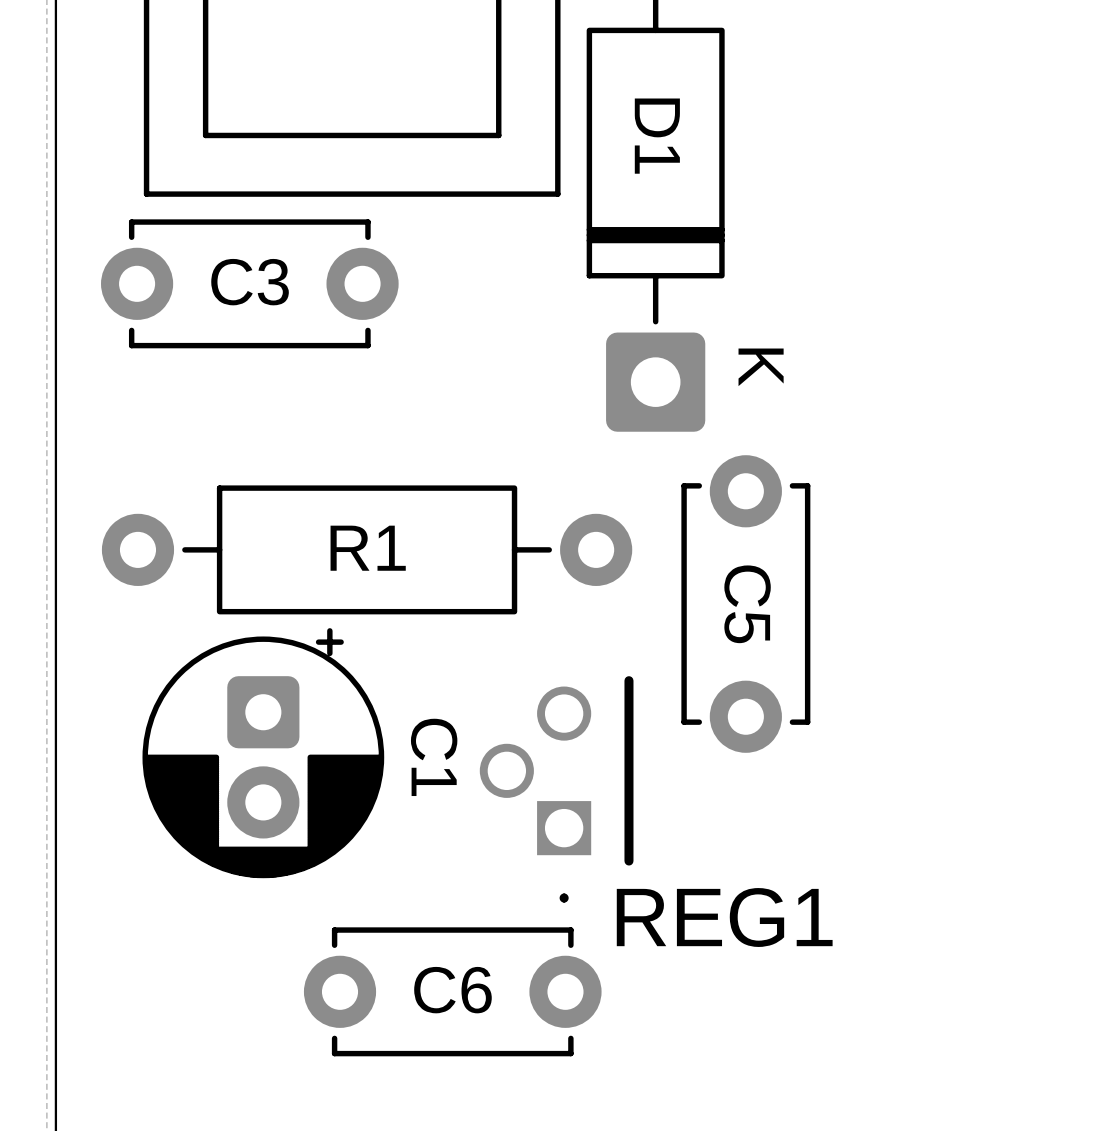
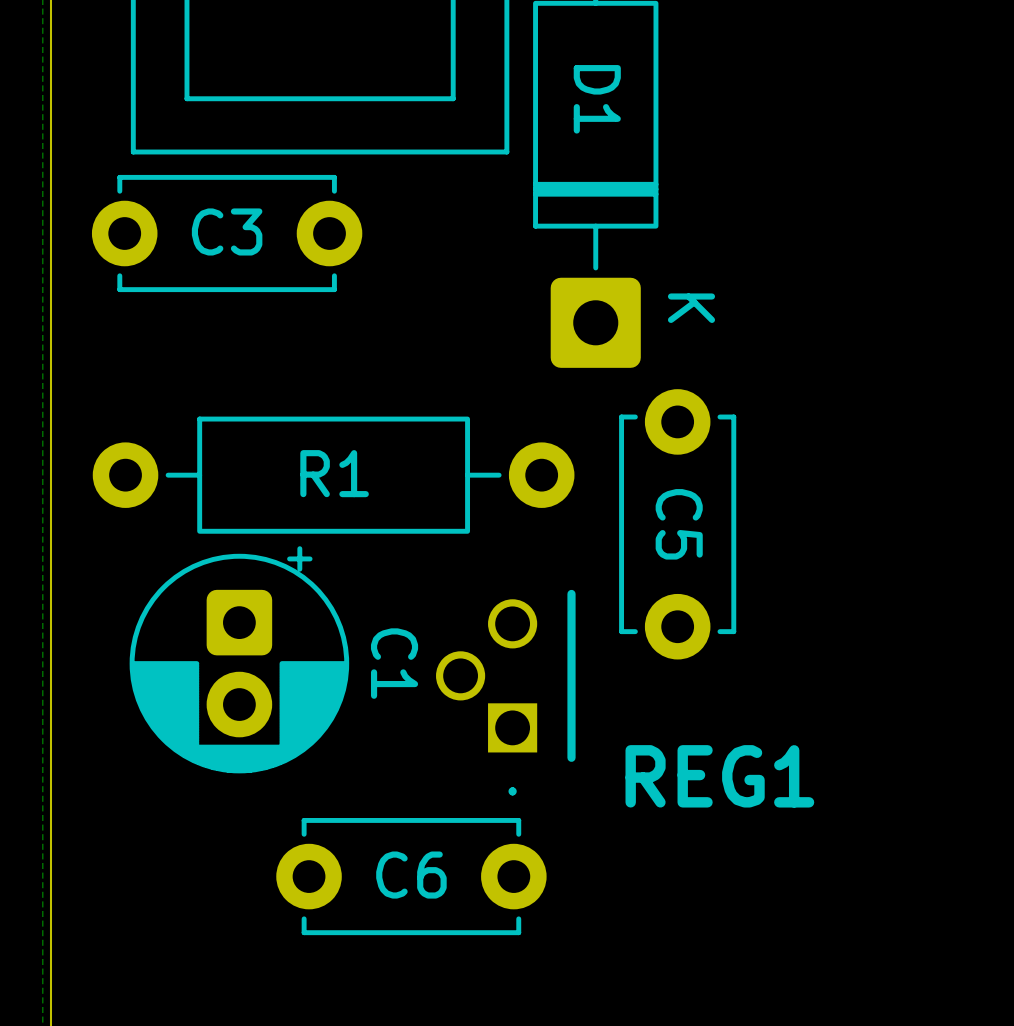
REG1 name position: REG1 (724, 917) -> REG1 (719, 776)

